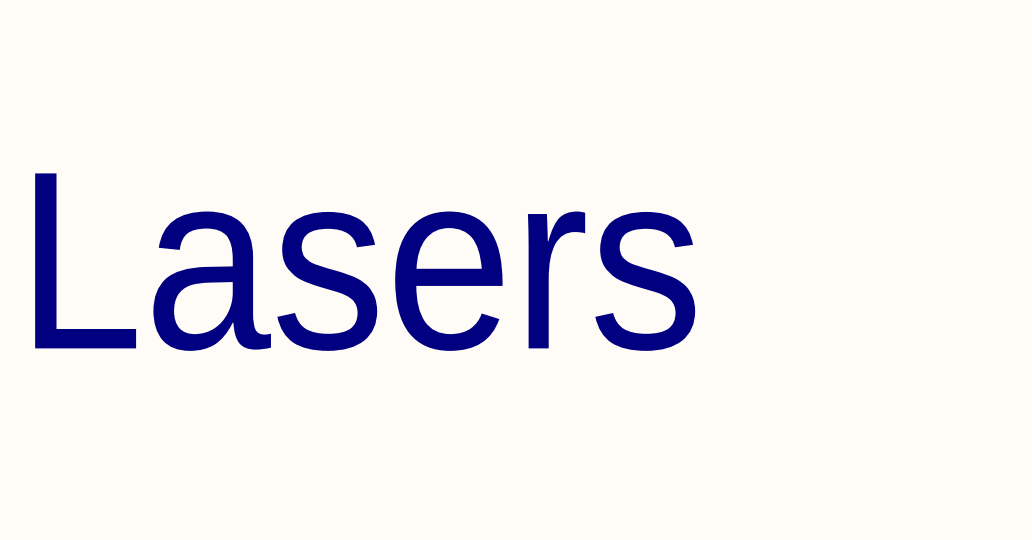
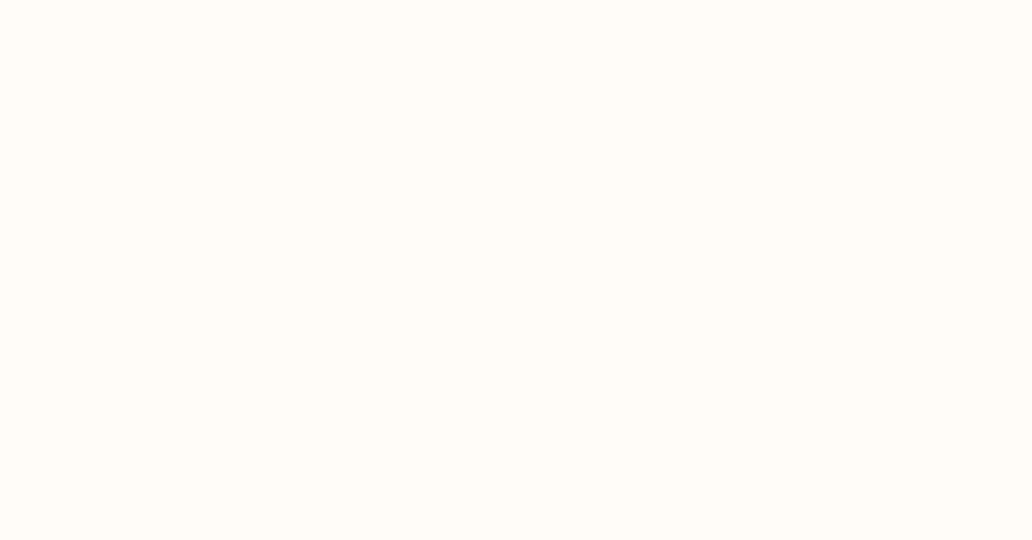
text: Lasers (365, 262) -> none

